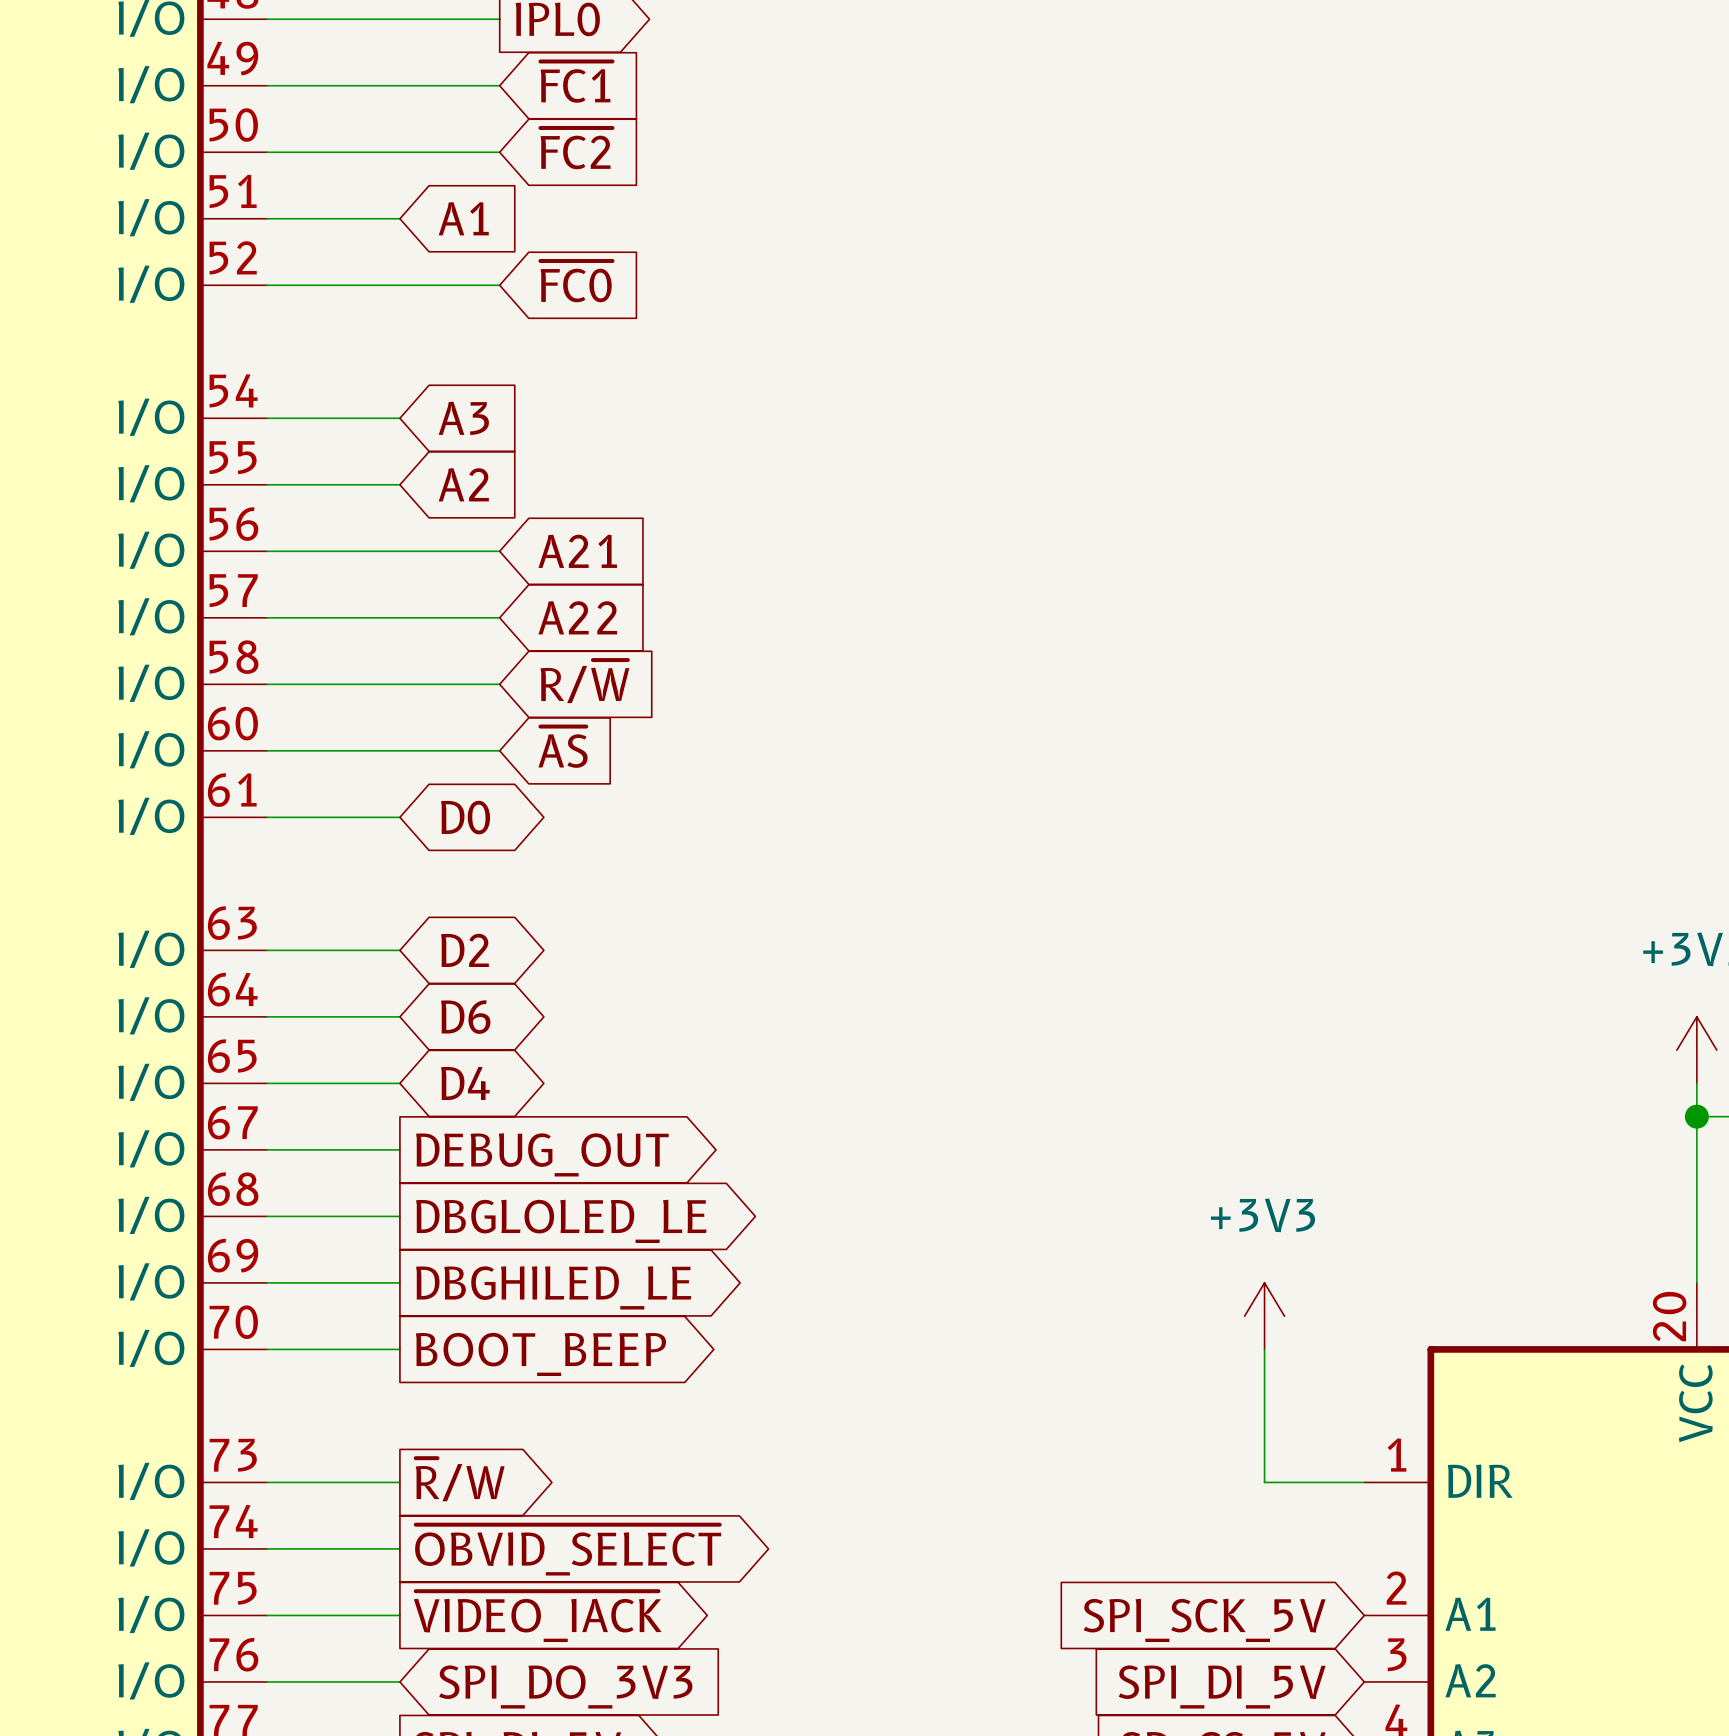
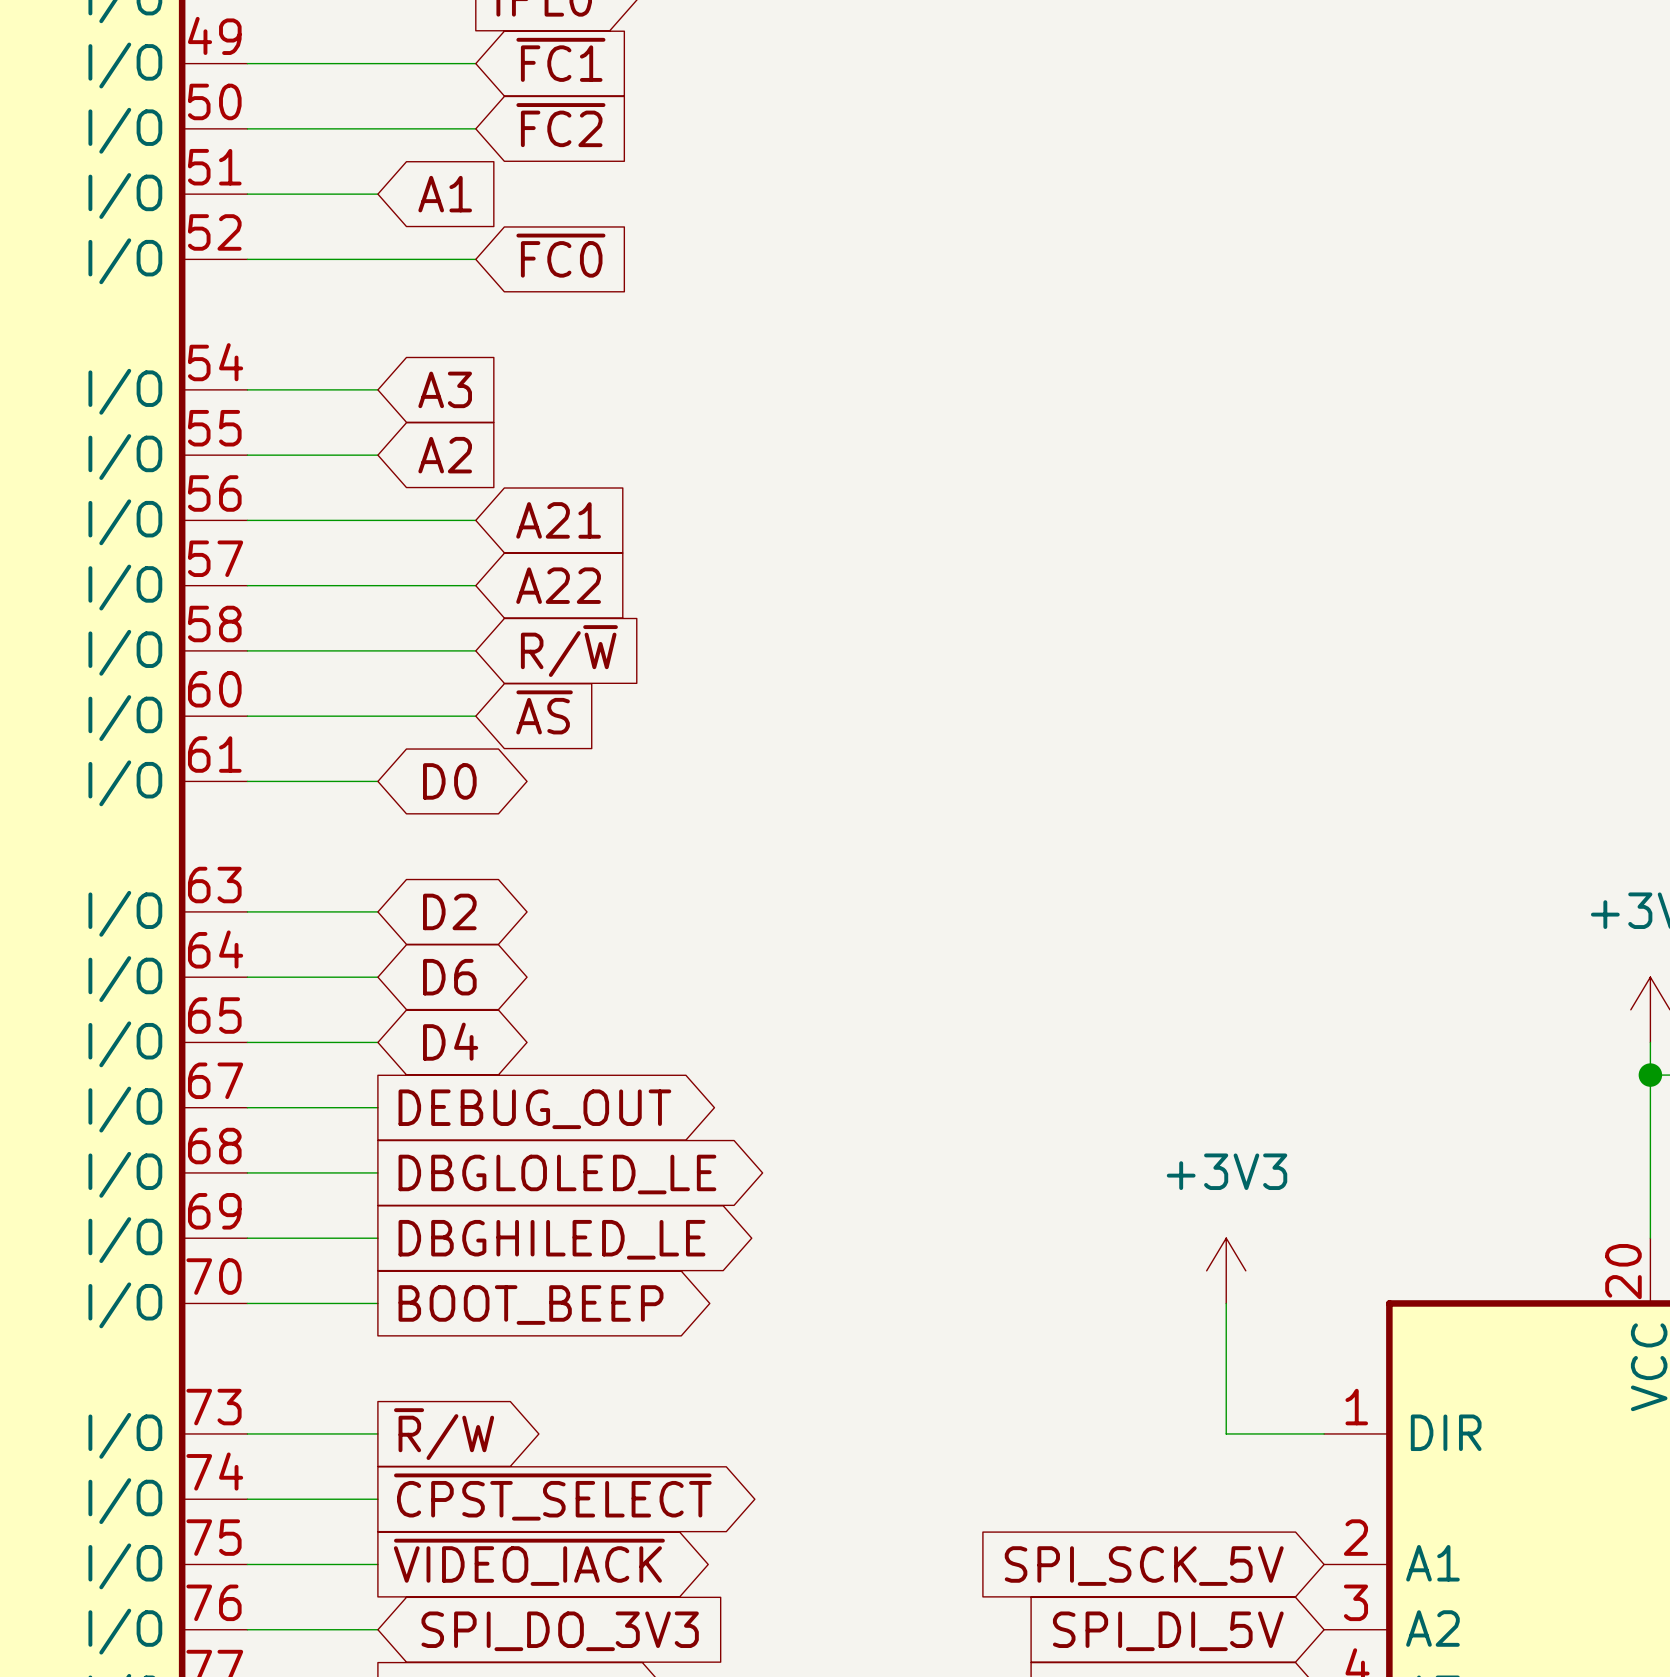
global label: ~{OBVID_SELECT} (568, 1550) -> ~{CPST_SELECT} (552, 1497)

